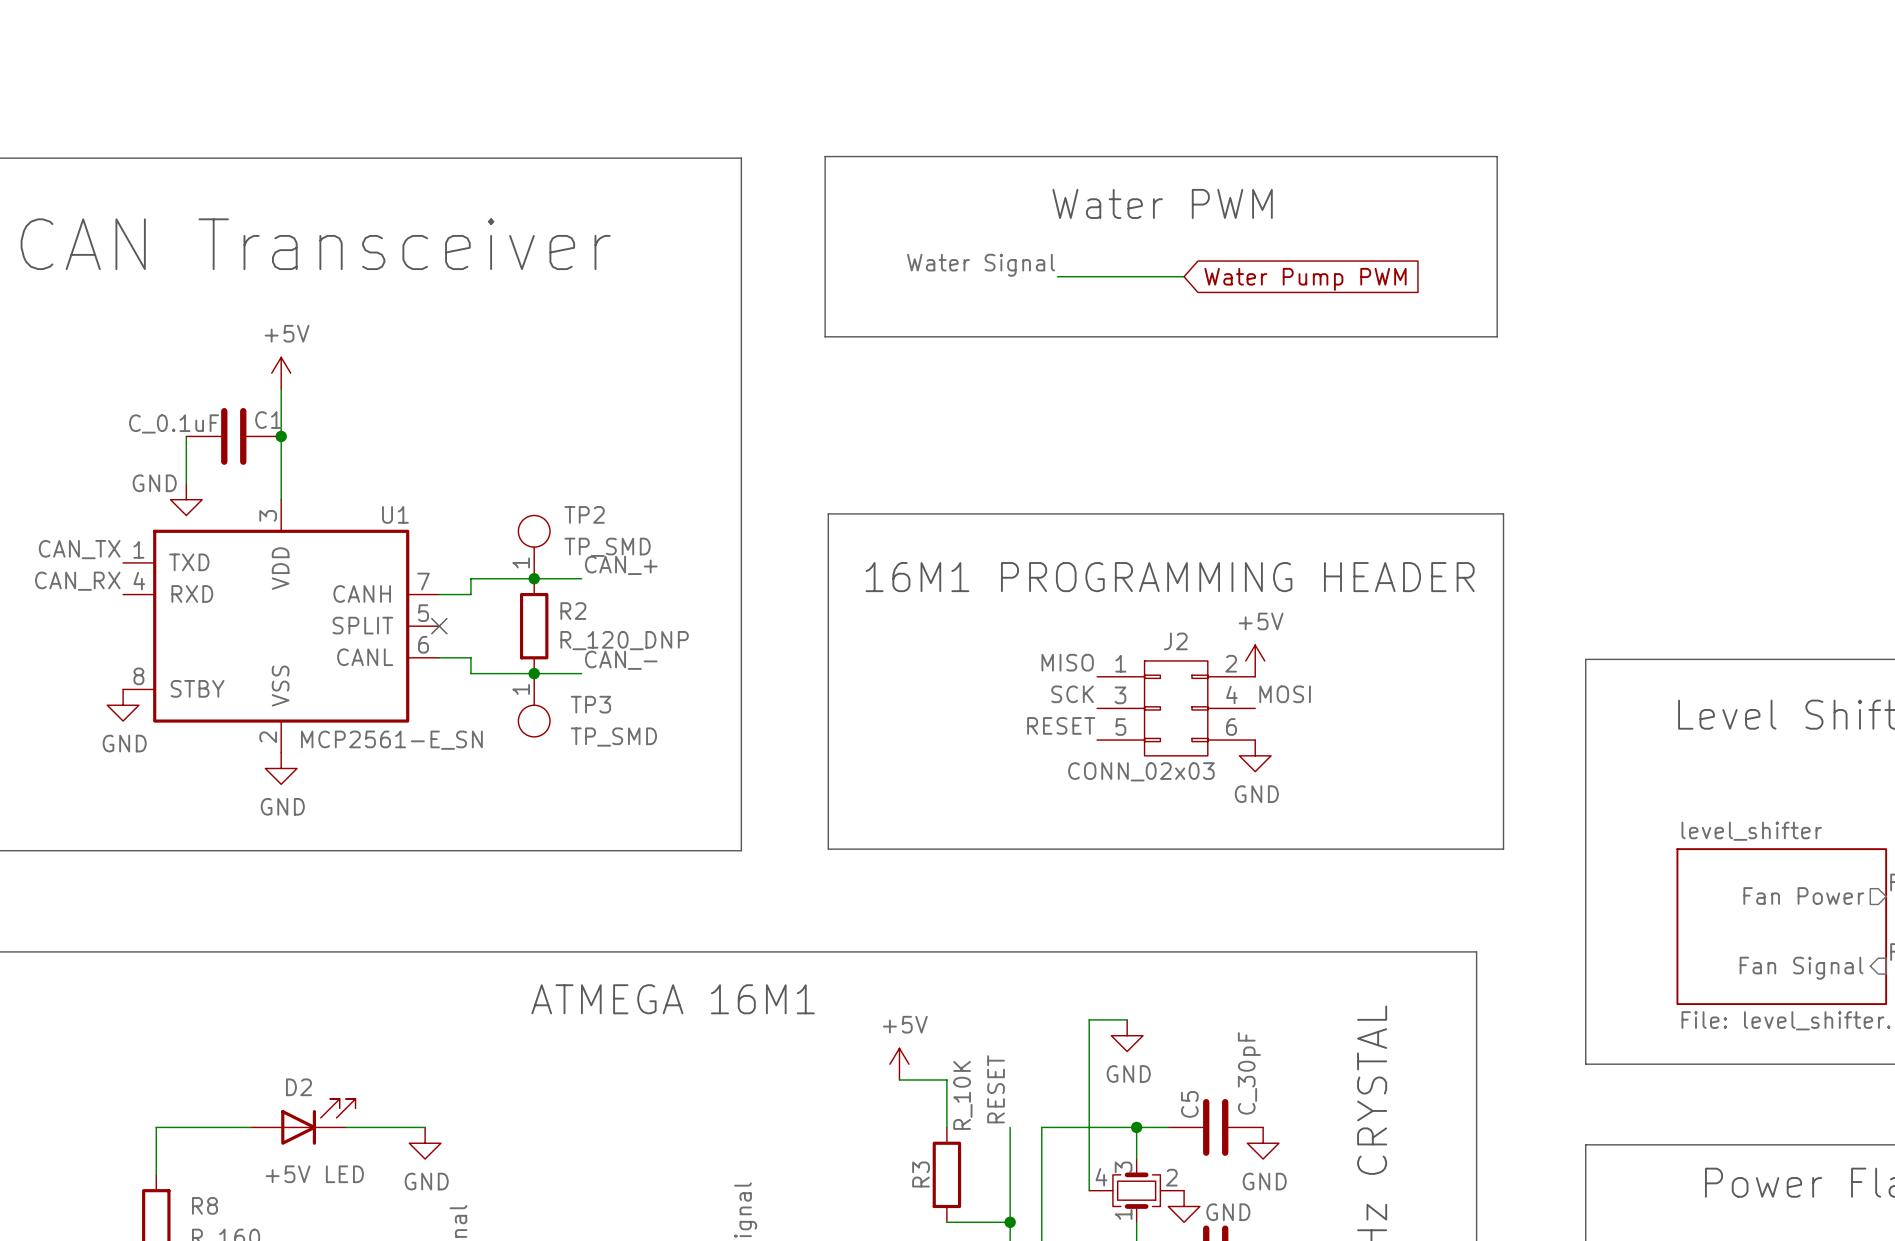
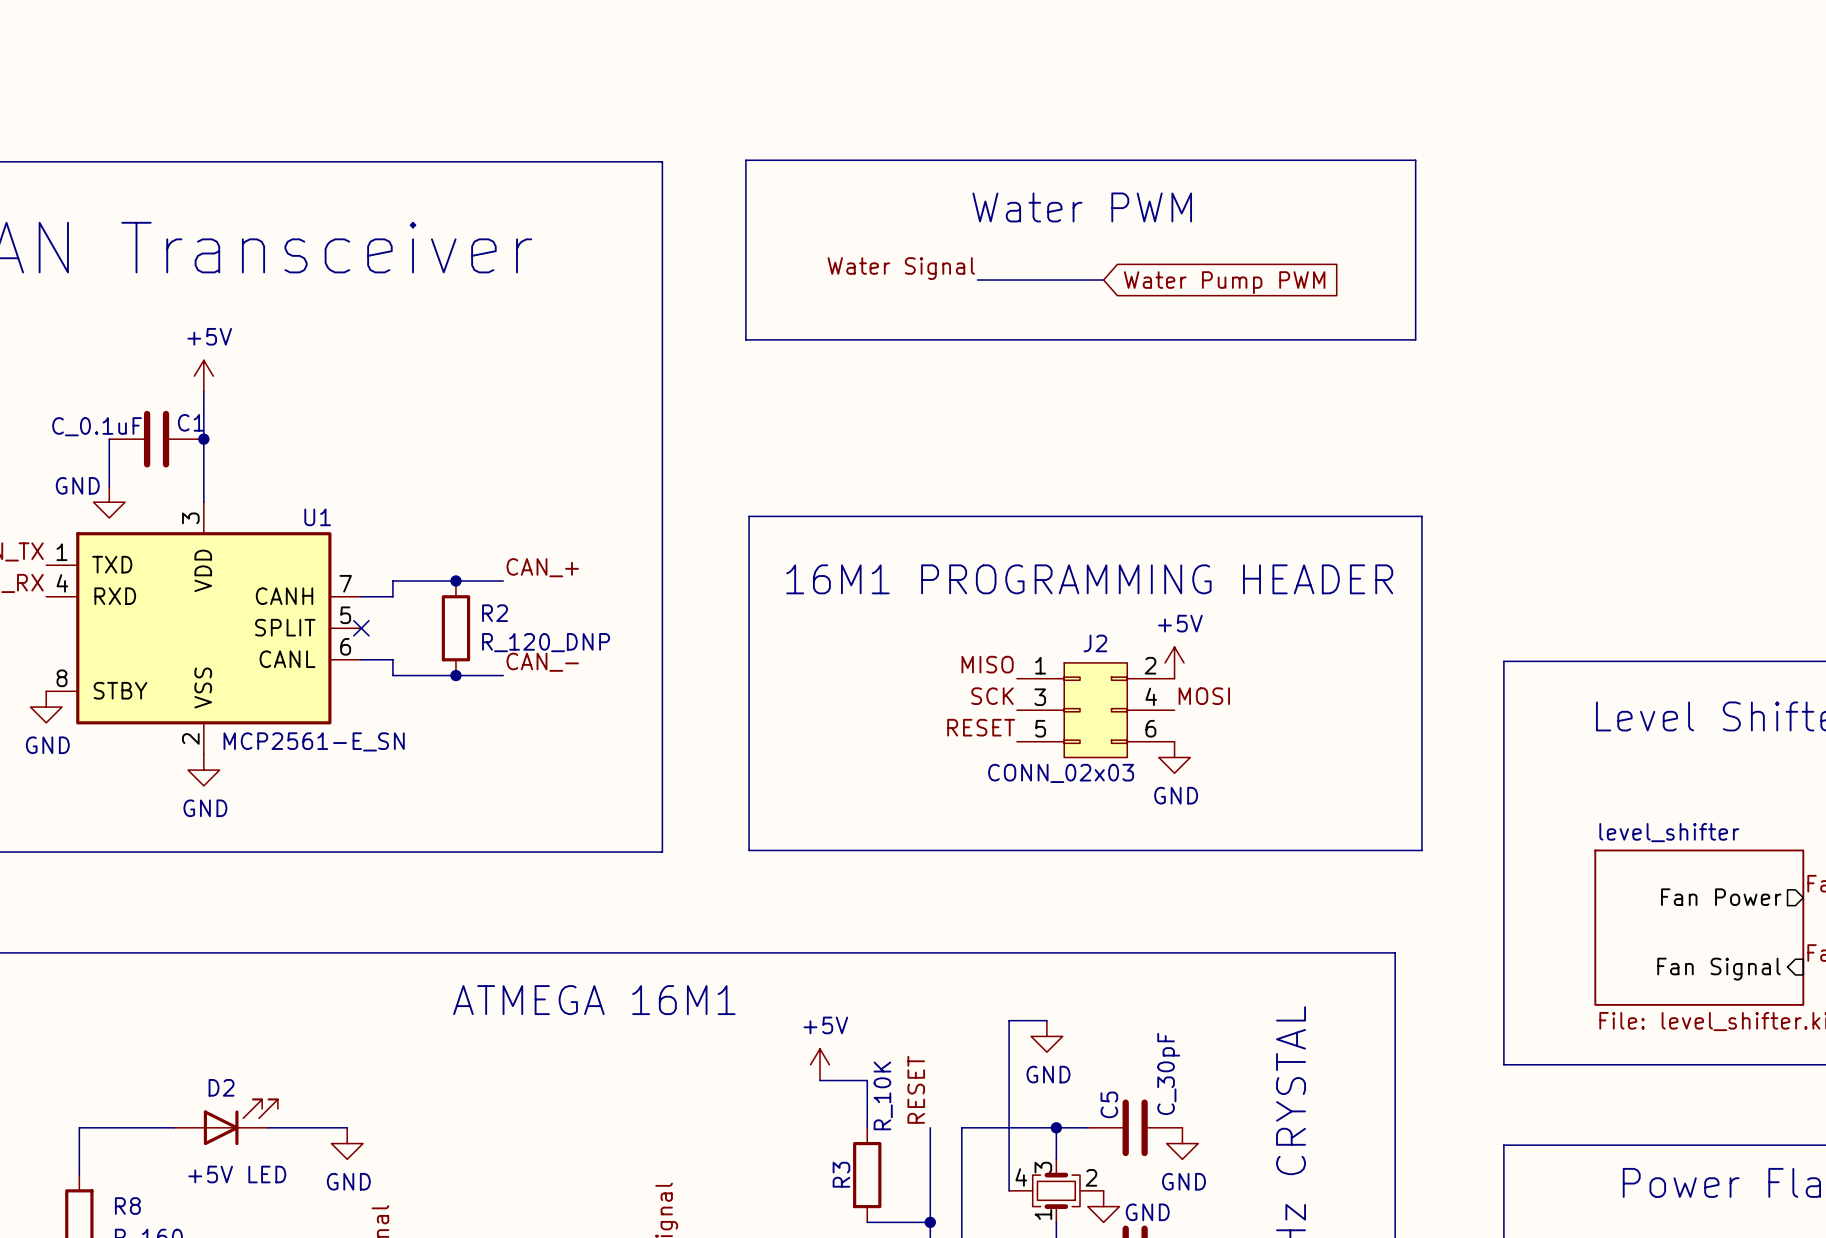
TP2: TP_SMD (534, 547) -> none
TP3: TP_SMD (534, 705) -> none

